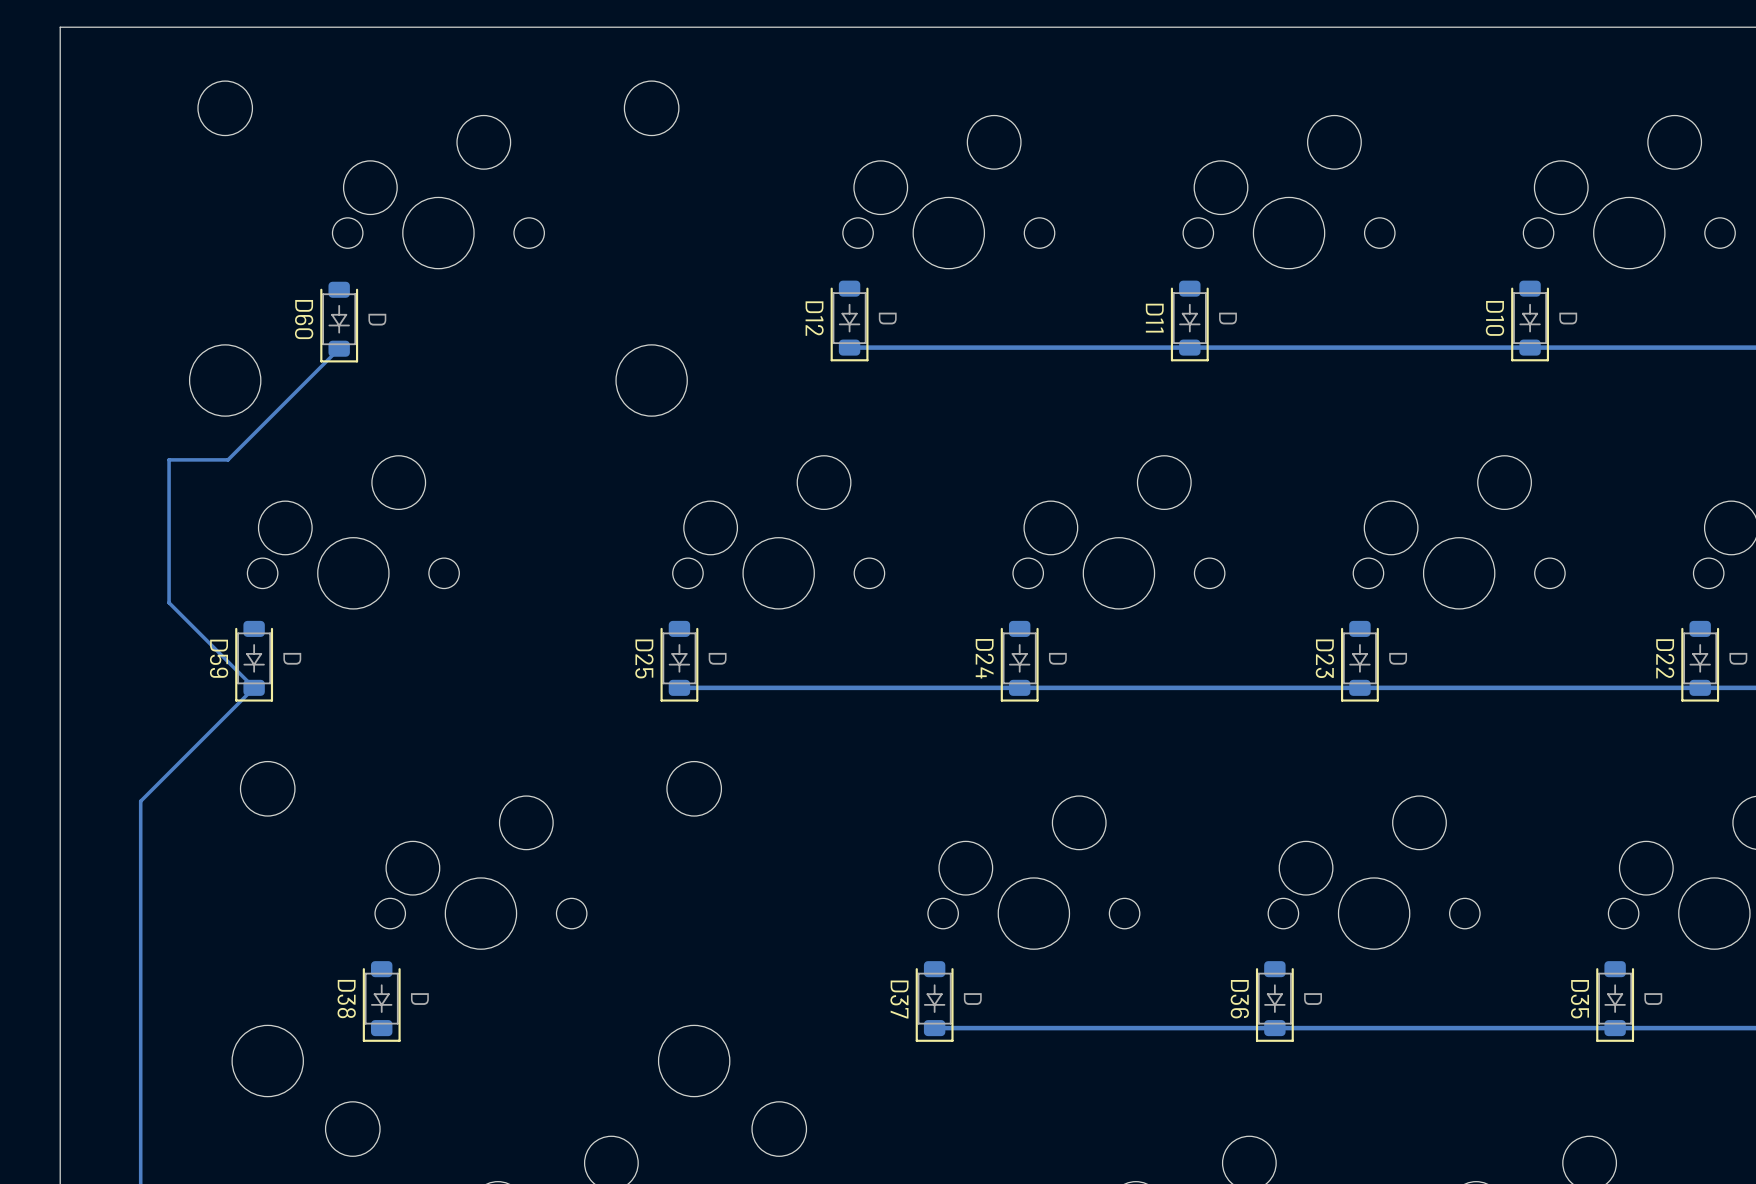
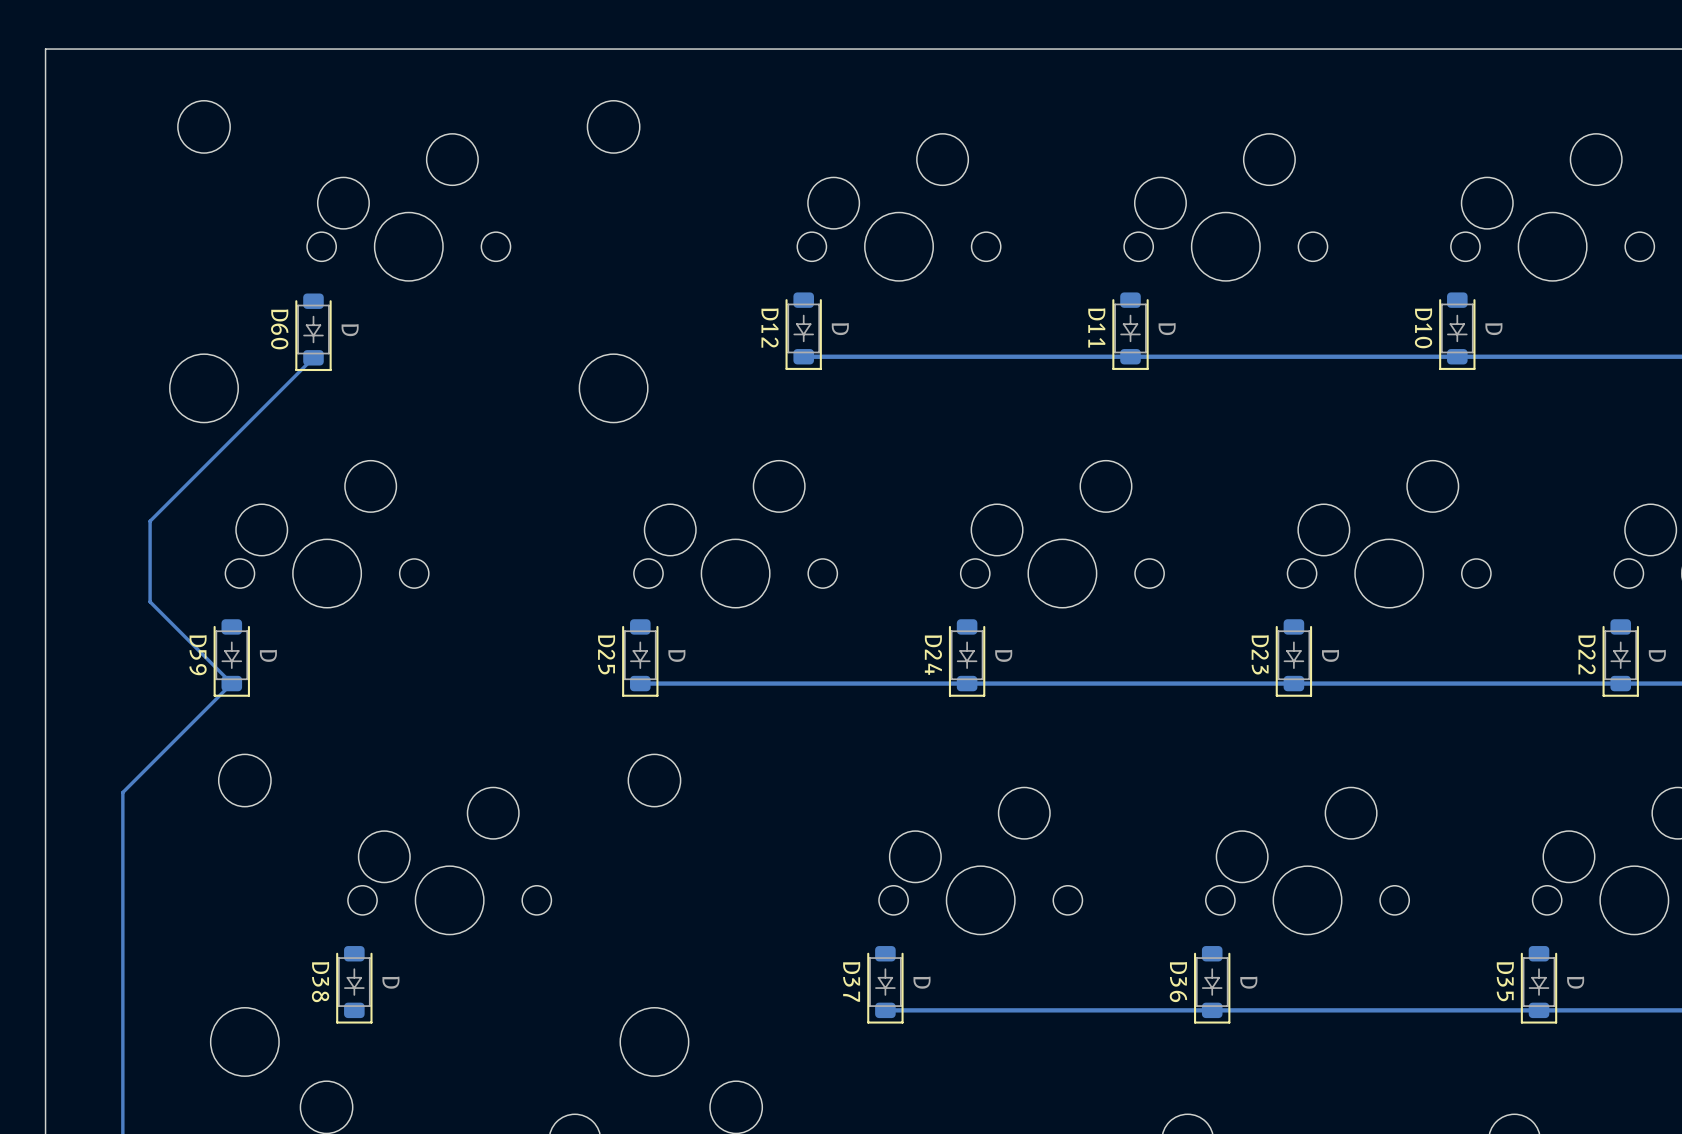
track: (228, 459) (169, 459) (169, 518) -> (206, 464) (150, 521)

